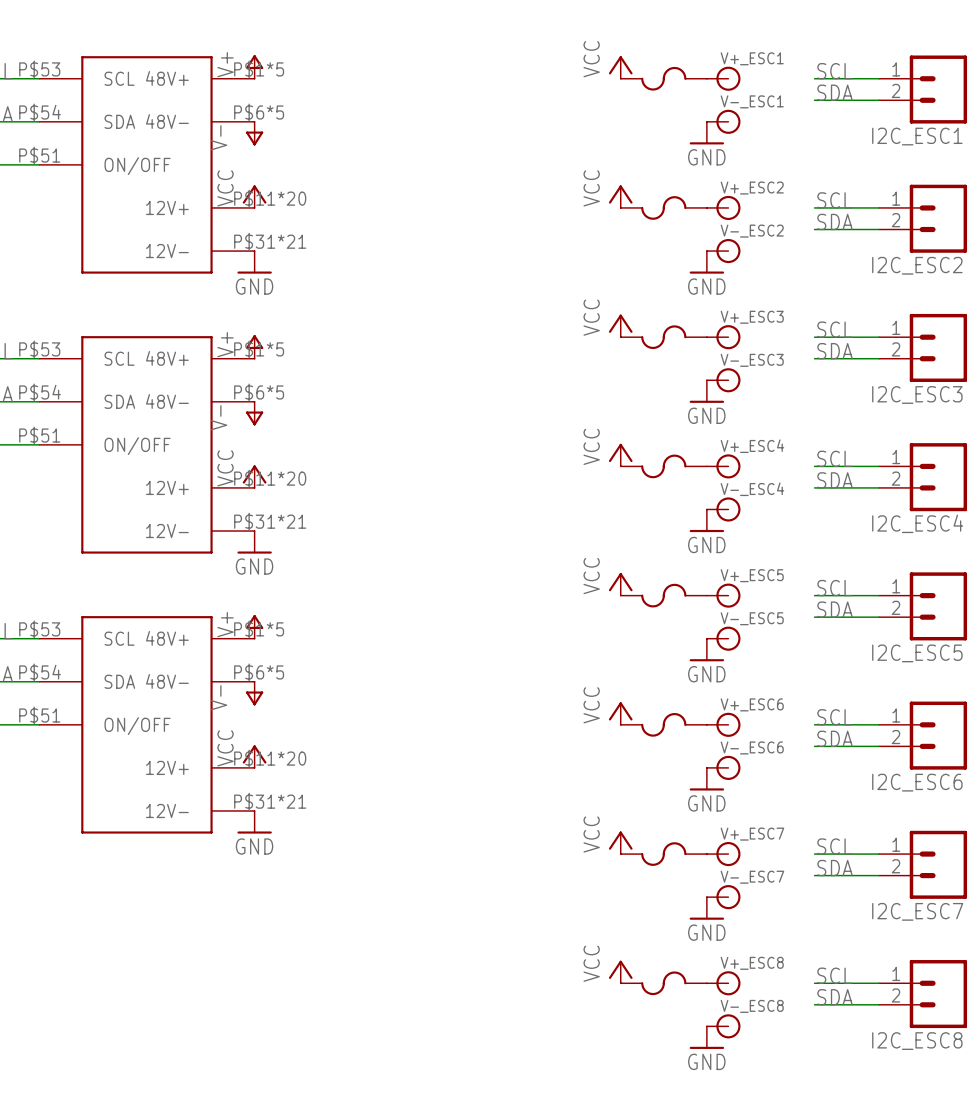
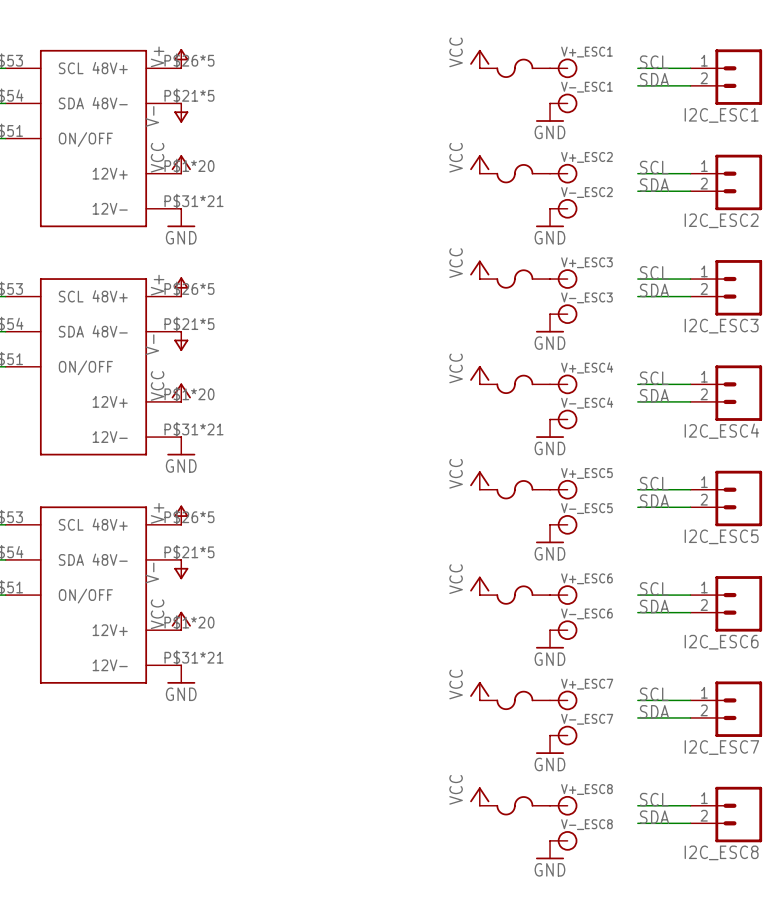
part pin number: P$1*5 (259, 69) -> P$26*5 (189, 60)
part pin number: P$6*5 (259, 112) -> P$21*5 (189, 95)
part pin number: P$11*20 (270, 198) -> P$1*20 (189, 166)
part pin number: P$1*5 (259, 349) -> P$26*5 (189, 288)
part pin number: P$6*5 (259, 392) -> P$21*5 (189, 324)
part pin number: P$11*20 (270, 478) -> P$1*20 (189, 394)
part pin number: P$1*5 (259, 629) -> P$26*5 (189, 517)
part pin number: P$6*5 (259, 672) -> P$21*5 (189, 552)
part pin number: P$11*20 (270, 758) -> P$1*20 (189, 622)

